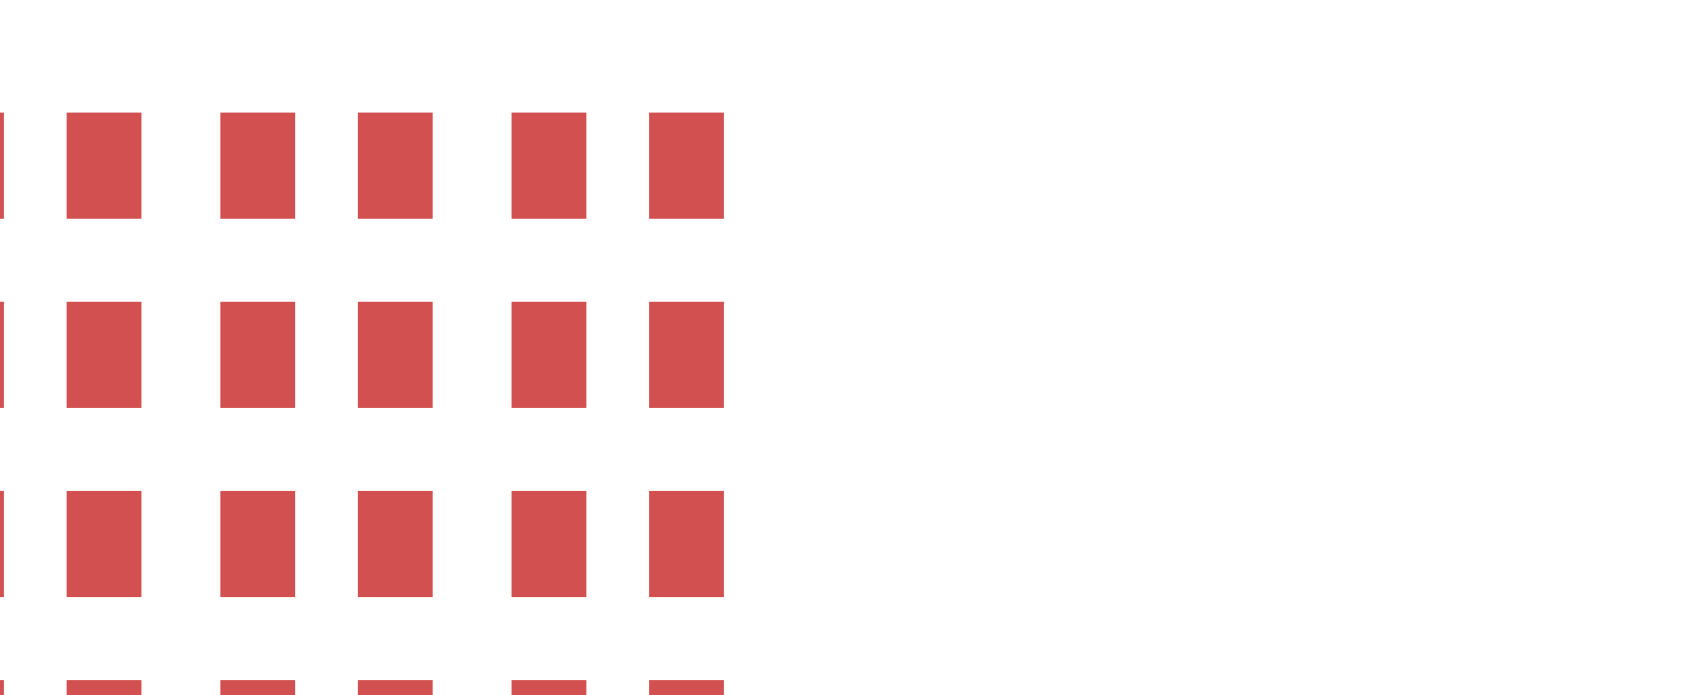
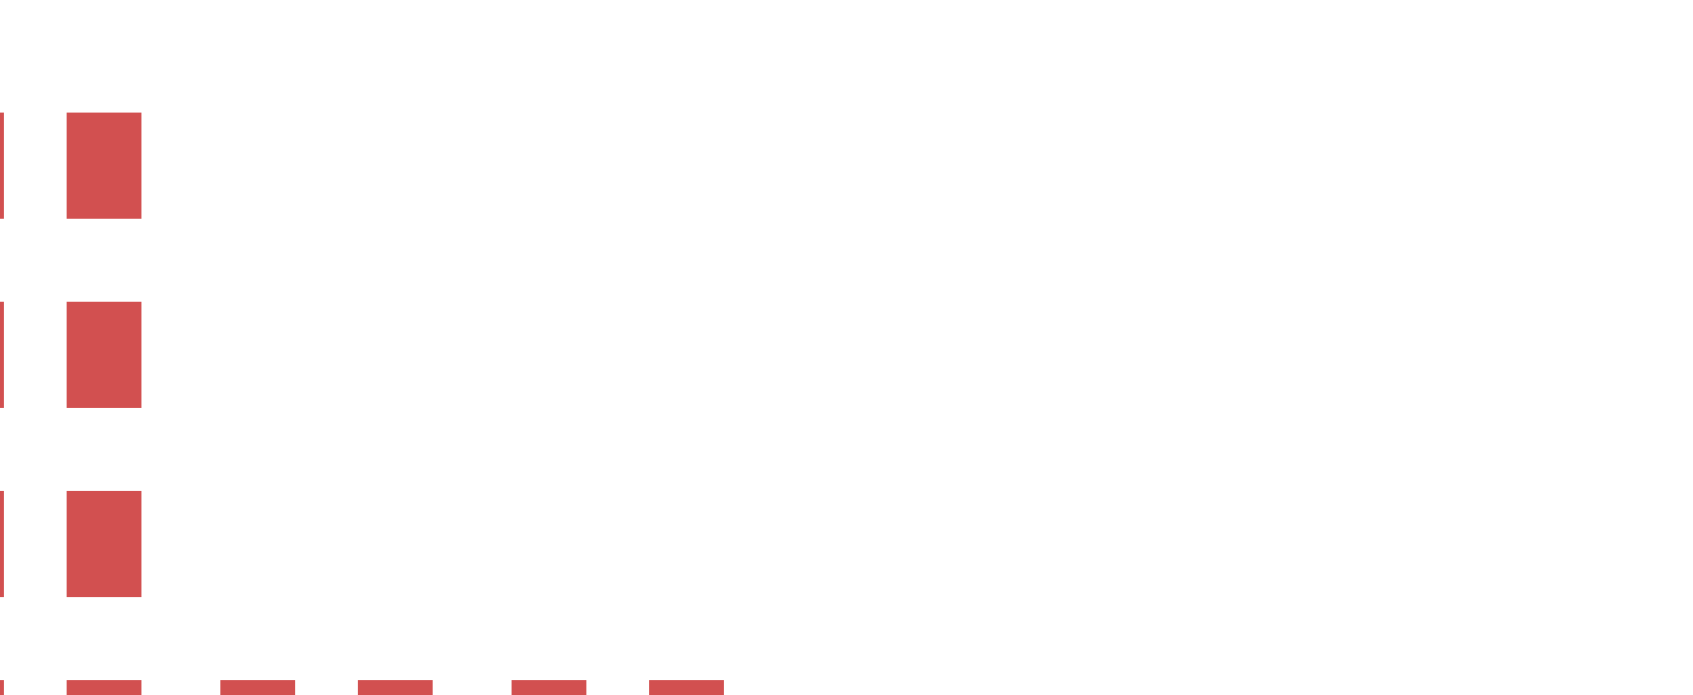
part: (326, 165) -> none
part: (617, 165) -> none
part: (326, 354) -> none
part: (617, 354) -> none
part: (326, 544) -> none
part: (617, 544) -> none

